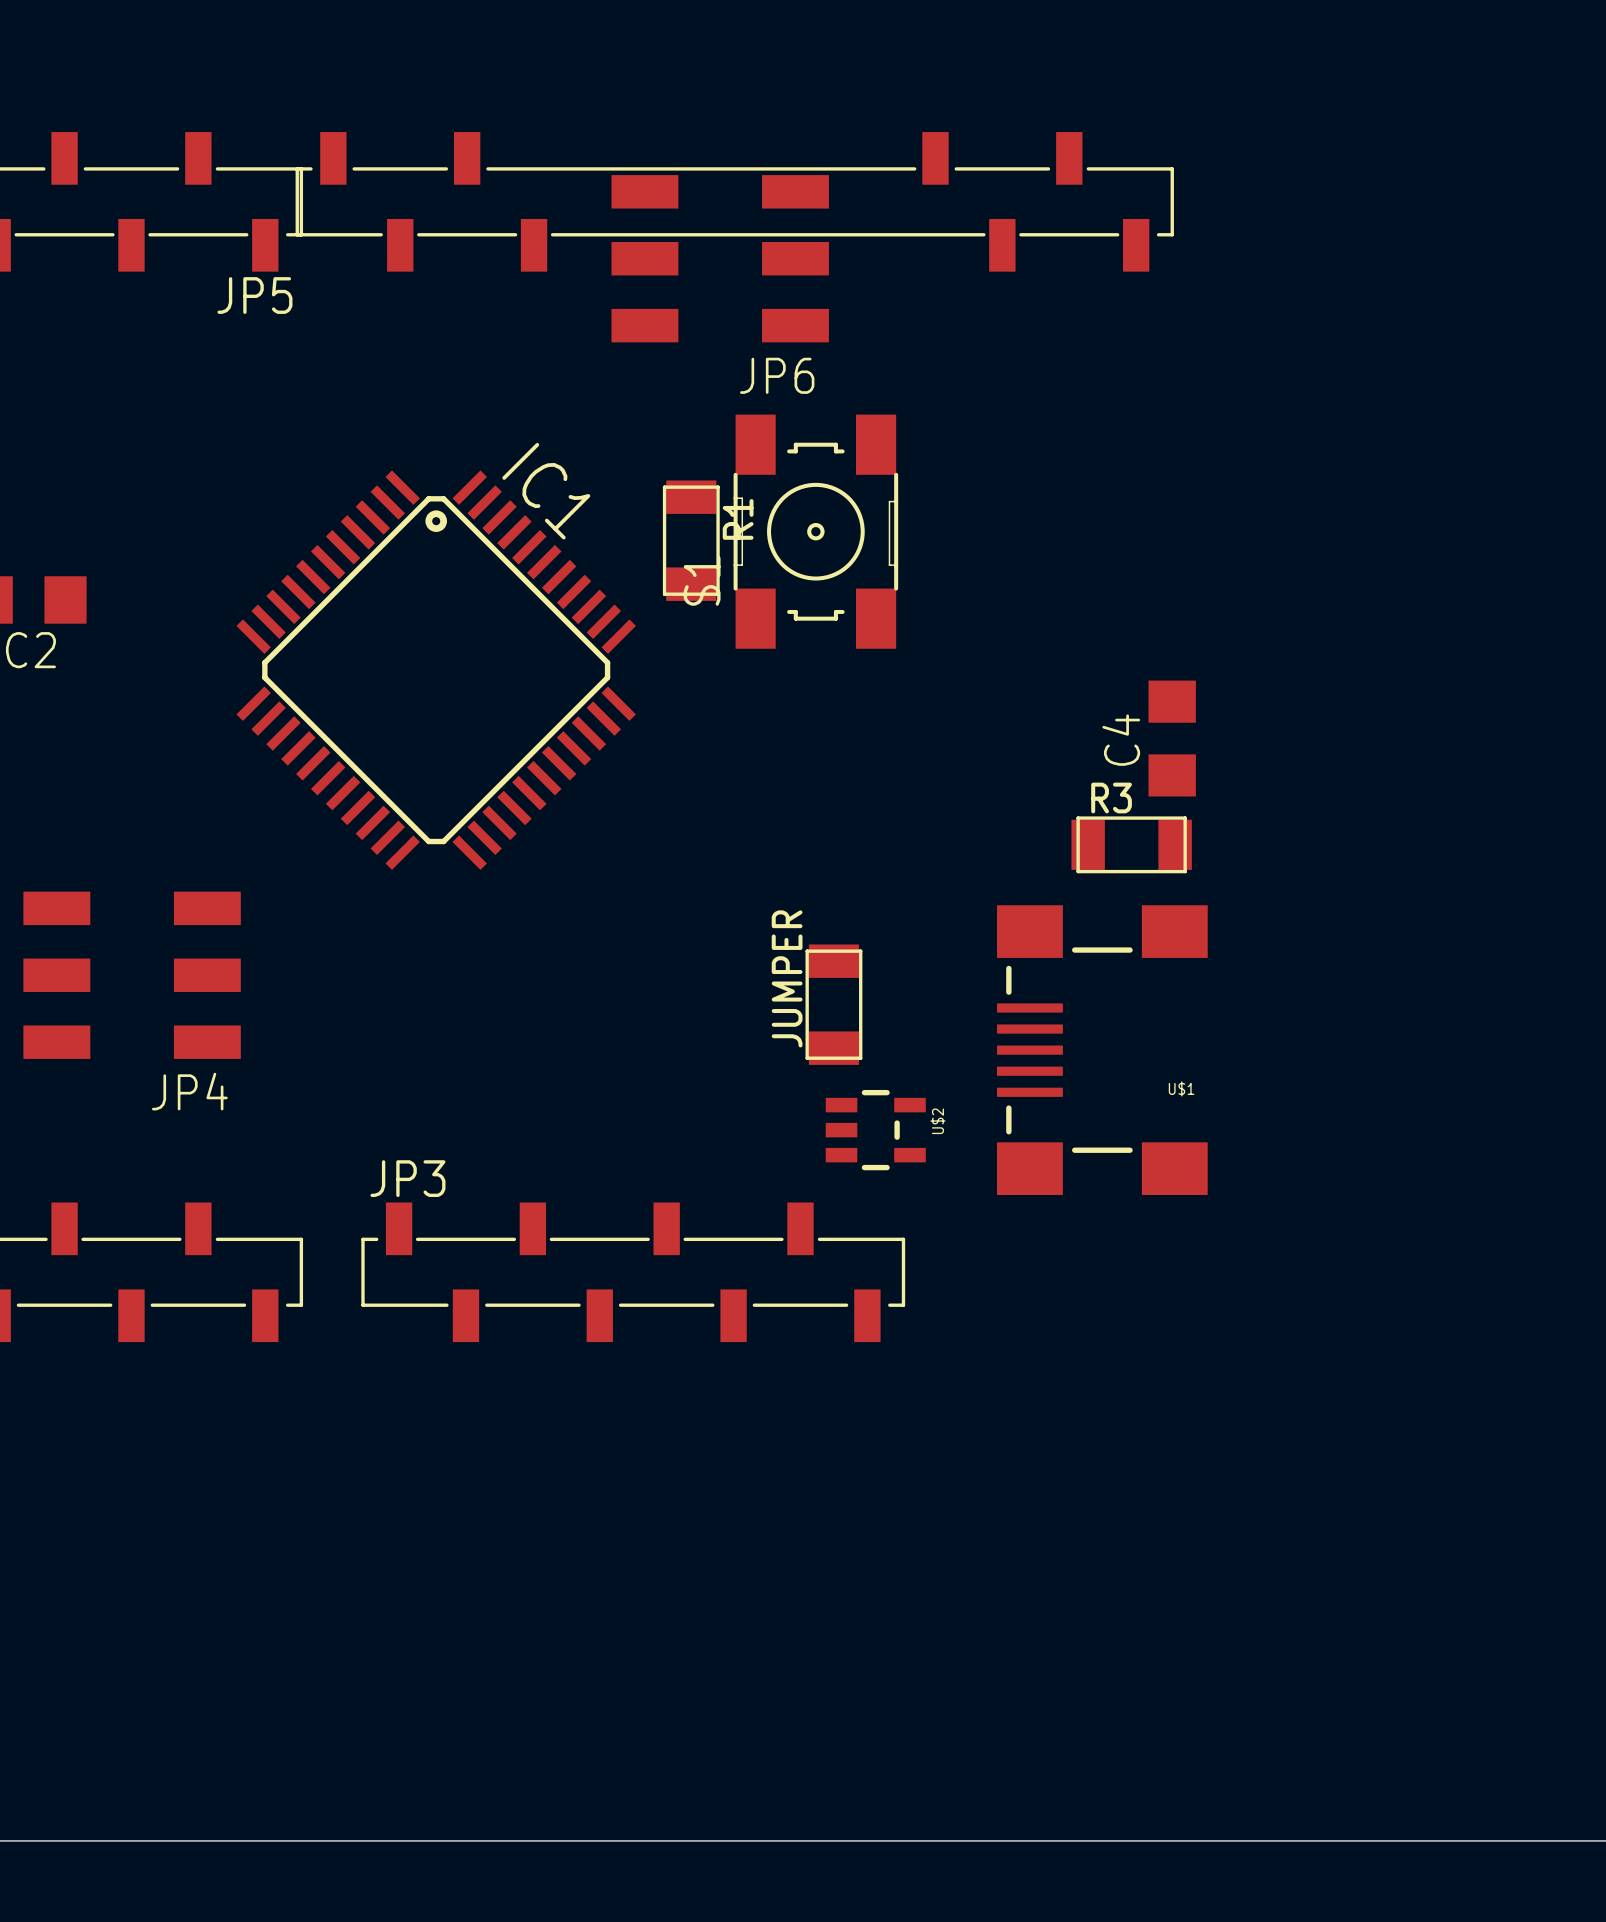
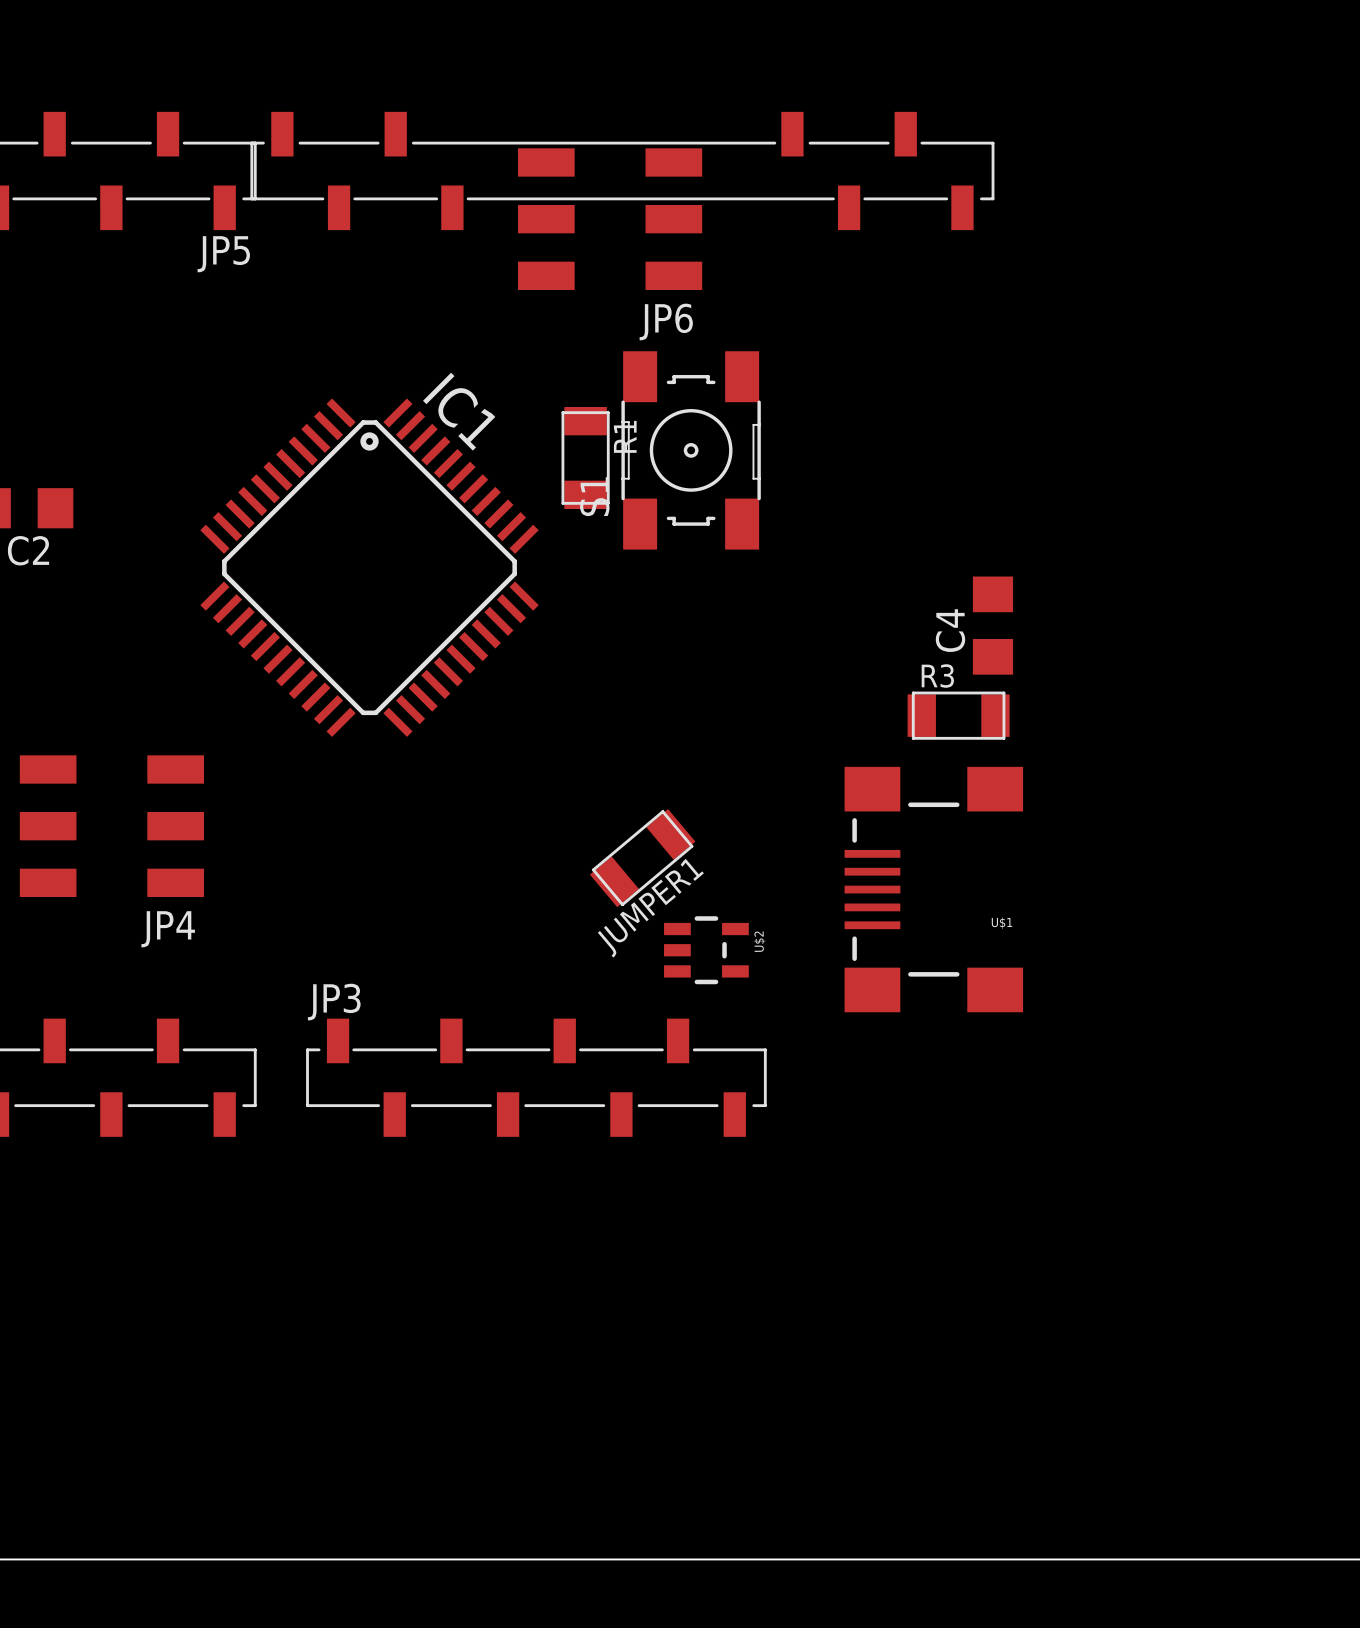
JUMPER: (833, 1004) -> none
JUMPER1: none -> (642, 858)
U$2 position: (875, 1130) -> (706, 950)

